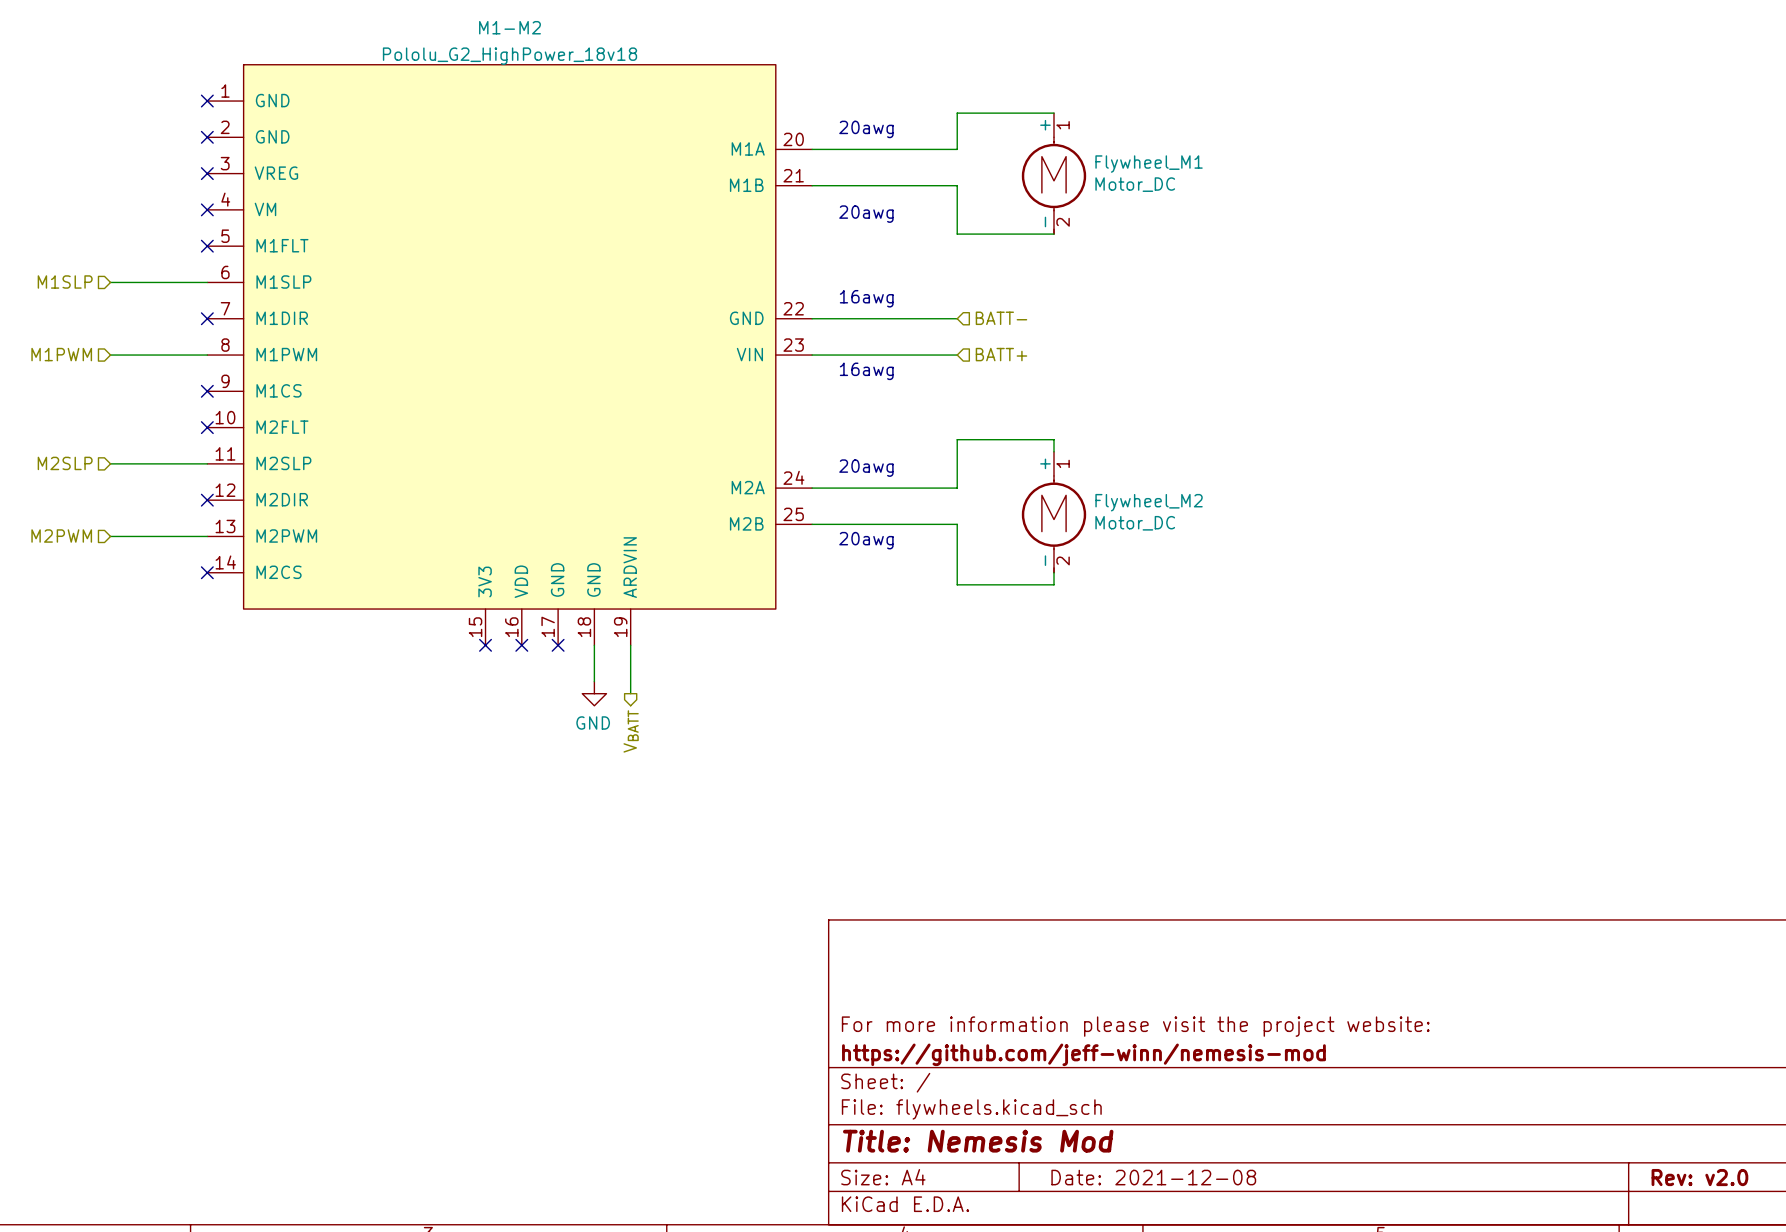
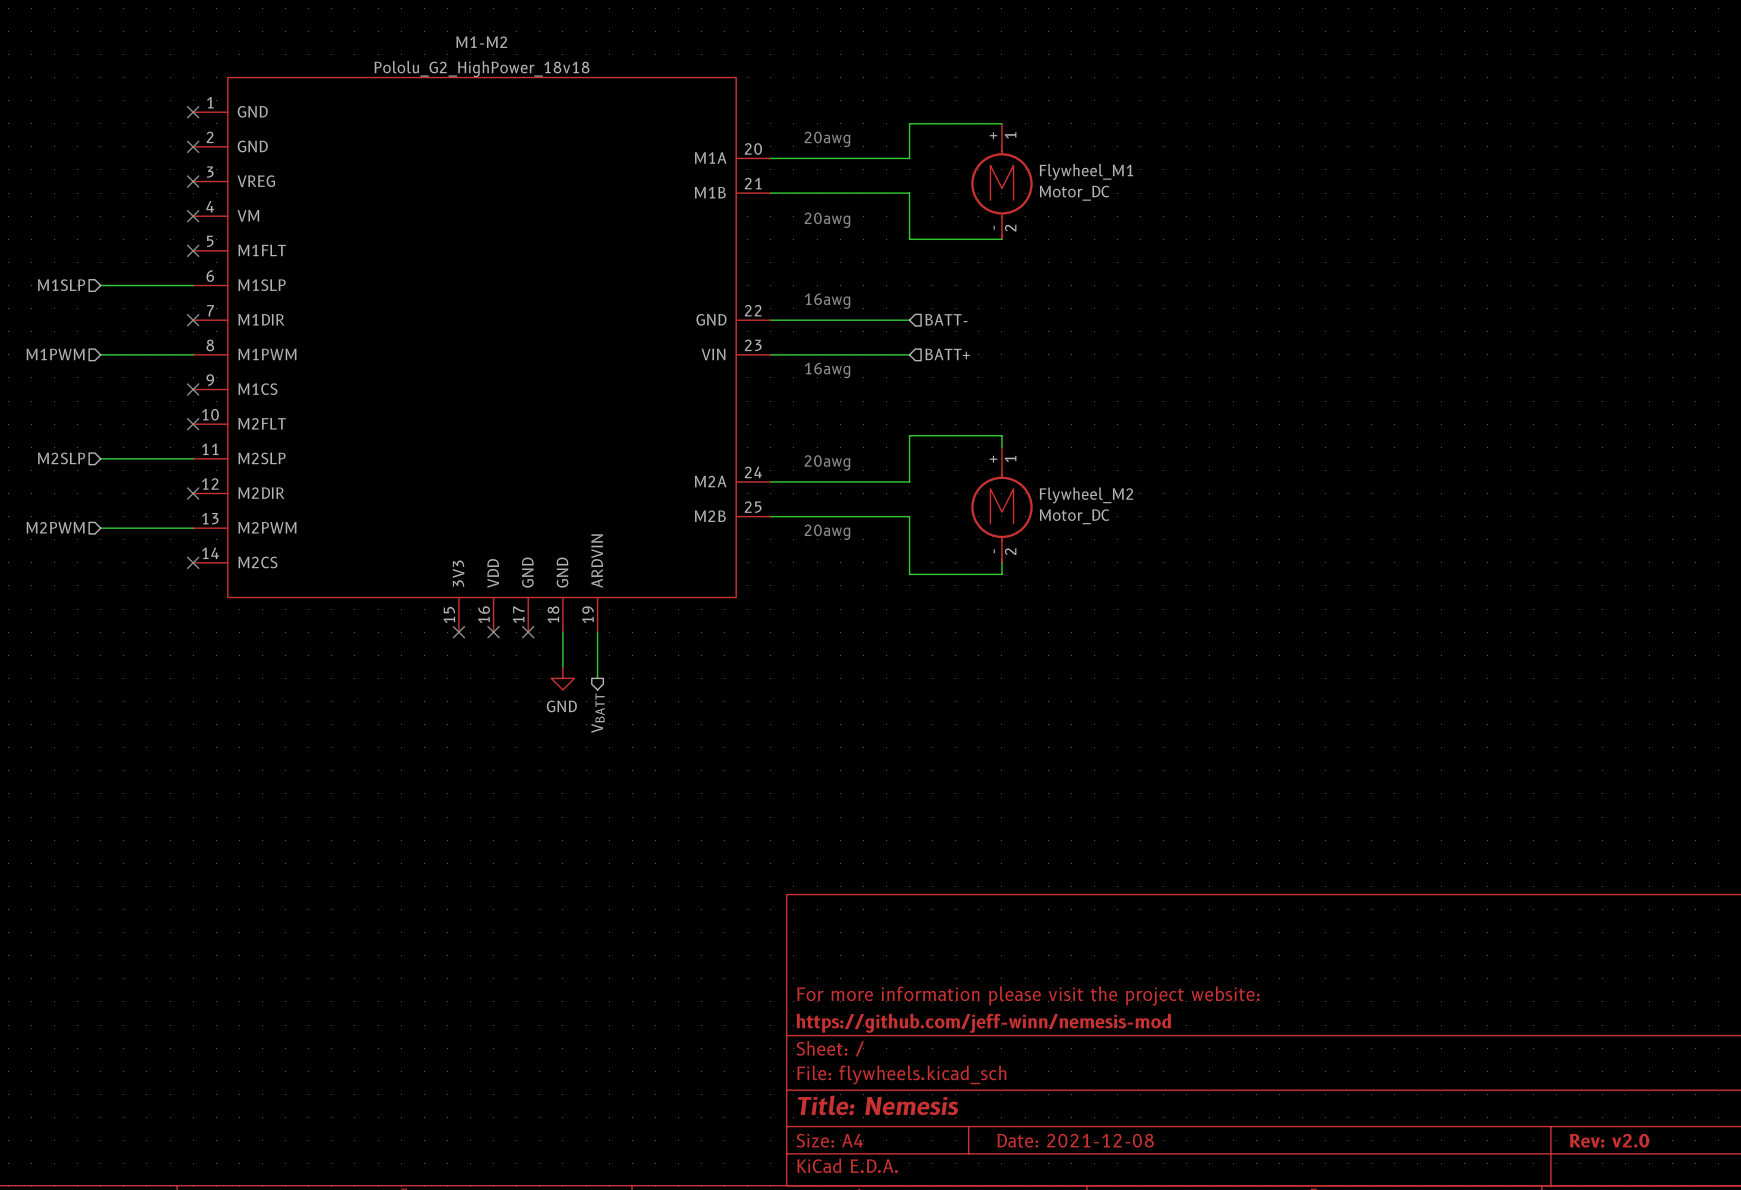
title block: Title: Nemesis Mod (978, 1141) -> Title: Nemesis (877, 1105)

